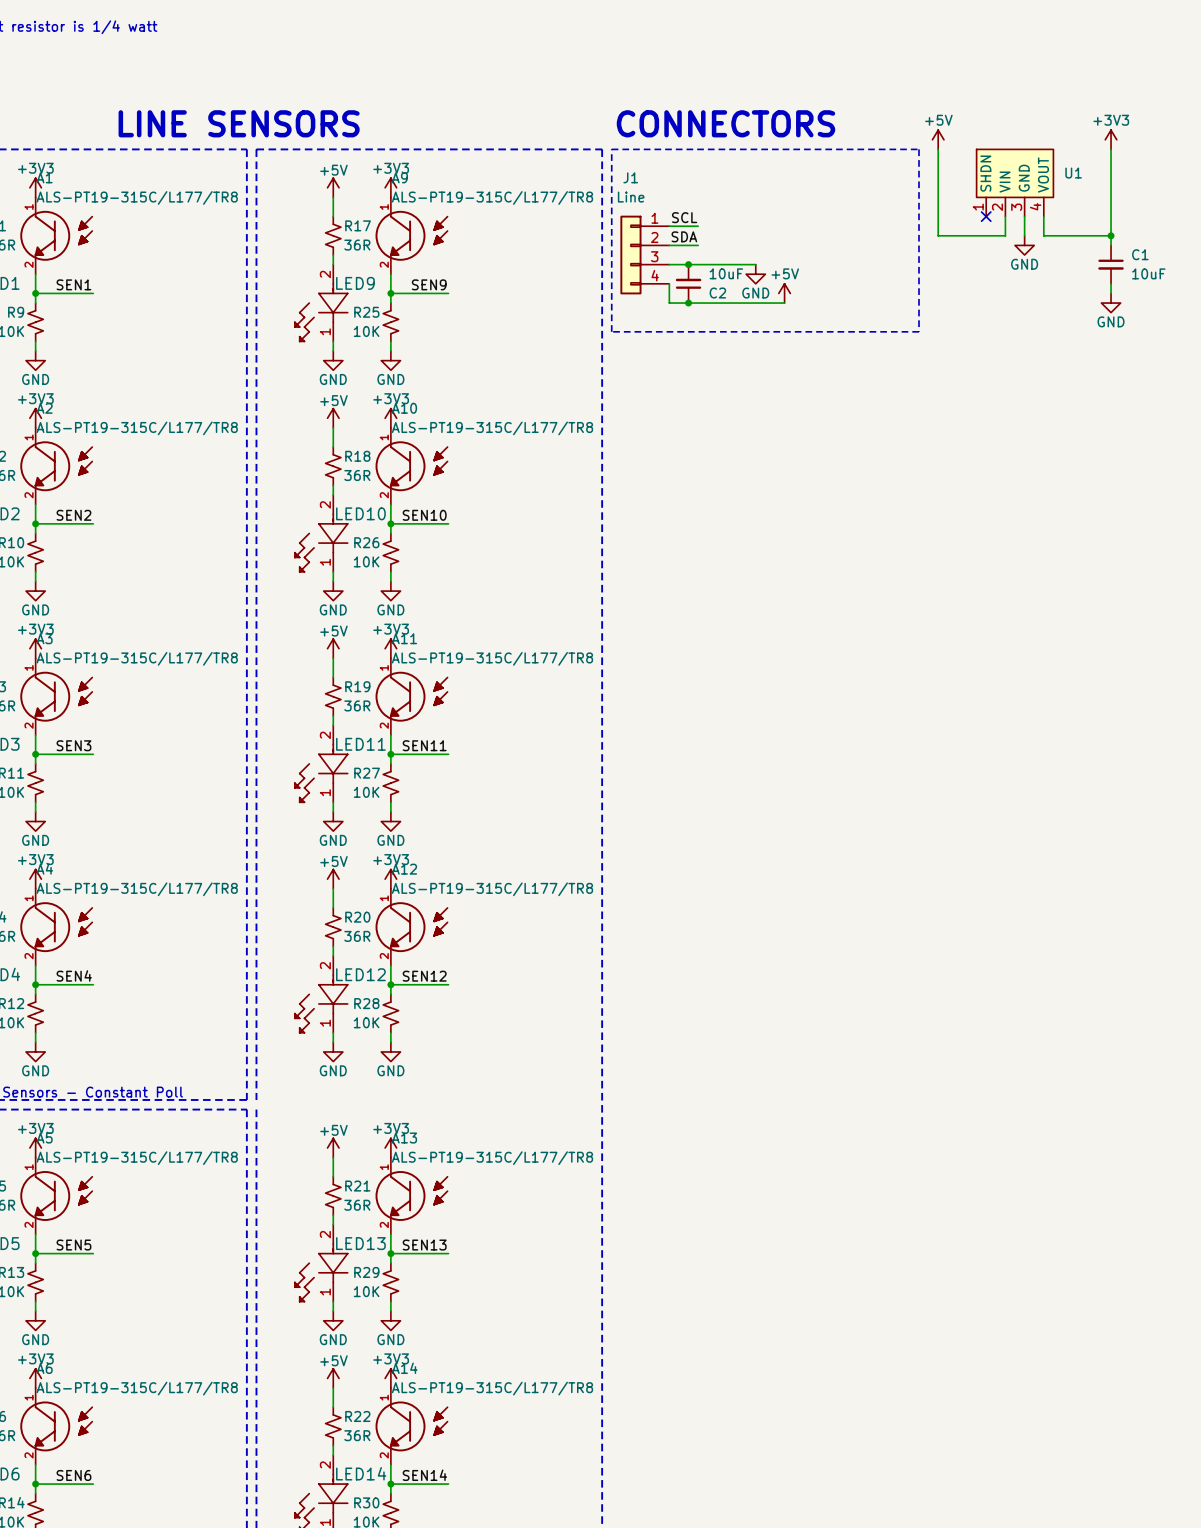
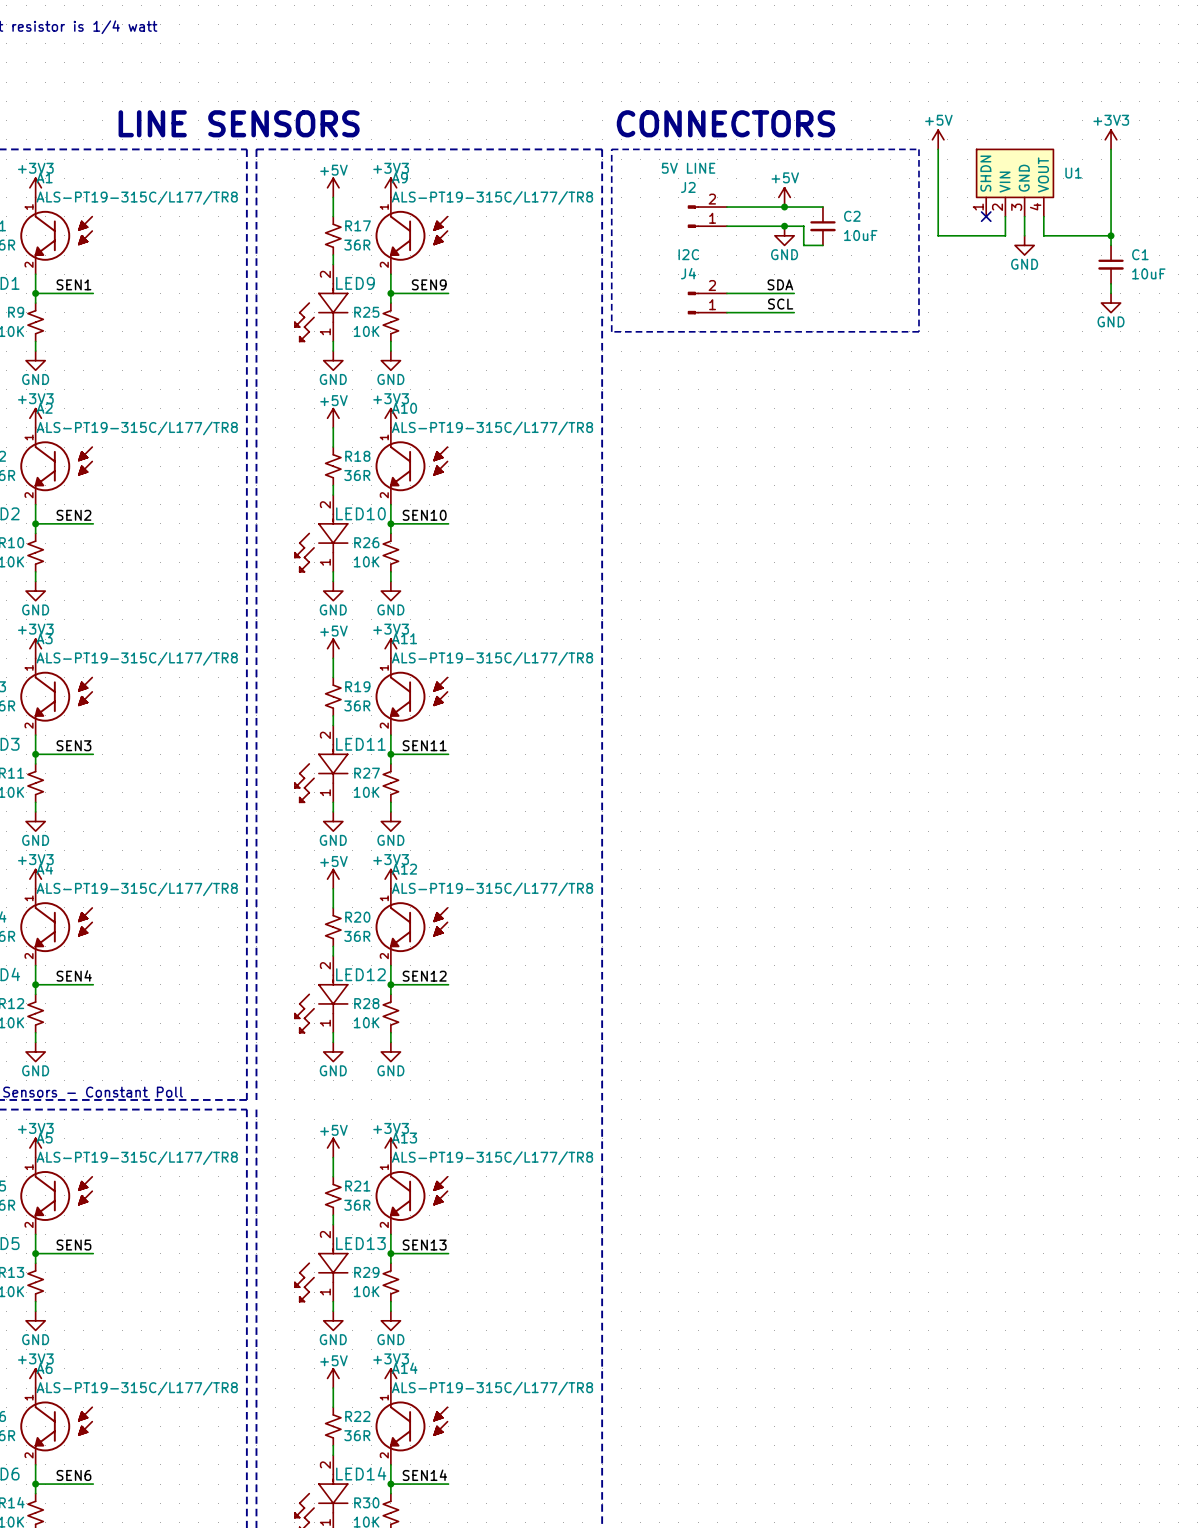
wire: none -> (726, 207) (822, 207)
junction: none -> (784, 207)
J2: none -> 5V LINE (707, 216)
label position: SCL (684, 217) -> SCL (780, 304)
wire: (669, 226) (698, 226) -> none
wire: none -> (726, 226) (803, 226) (803, 245) (822, 245)
junction: none -> (784, 226)
label position: SDA (684, 236) -> SDA (780, 284)
wire: (669, 245) (698, 245) -> none
J1: Line (644, 255) -> none
wire: (669, 264) (755, 264) -> none
junction: (688, 264) -> none
C2 value position: 10uF (726, 273) -> 10uF (860, 235)
power symbol position: GND (755, 274) -> GND (784, 235)
wire: (669, 283) (669, 303) (784, 303) -> none
C2 rotation: 0° (688, 283) -> 180° (822, 226)
C2 position: (688, 283) -> (822, 226)
C2 name position: C2 (717, 293) -> C2 (852, 216)
wire: none -> (726, 293) (794, 293)
power symbol position: +5V (784, 293) -> +5V (784, 197)
junction: (688, 303) -> none
J4: none -> I2C (707, 303)
wire: none -> (726, 312) (794, 312)

